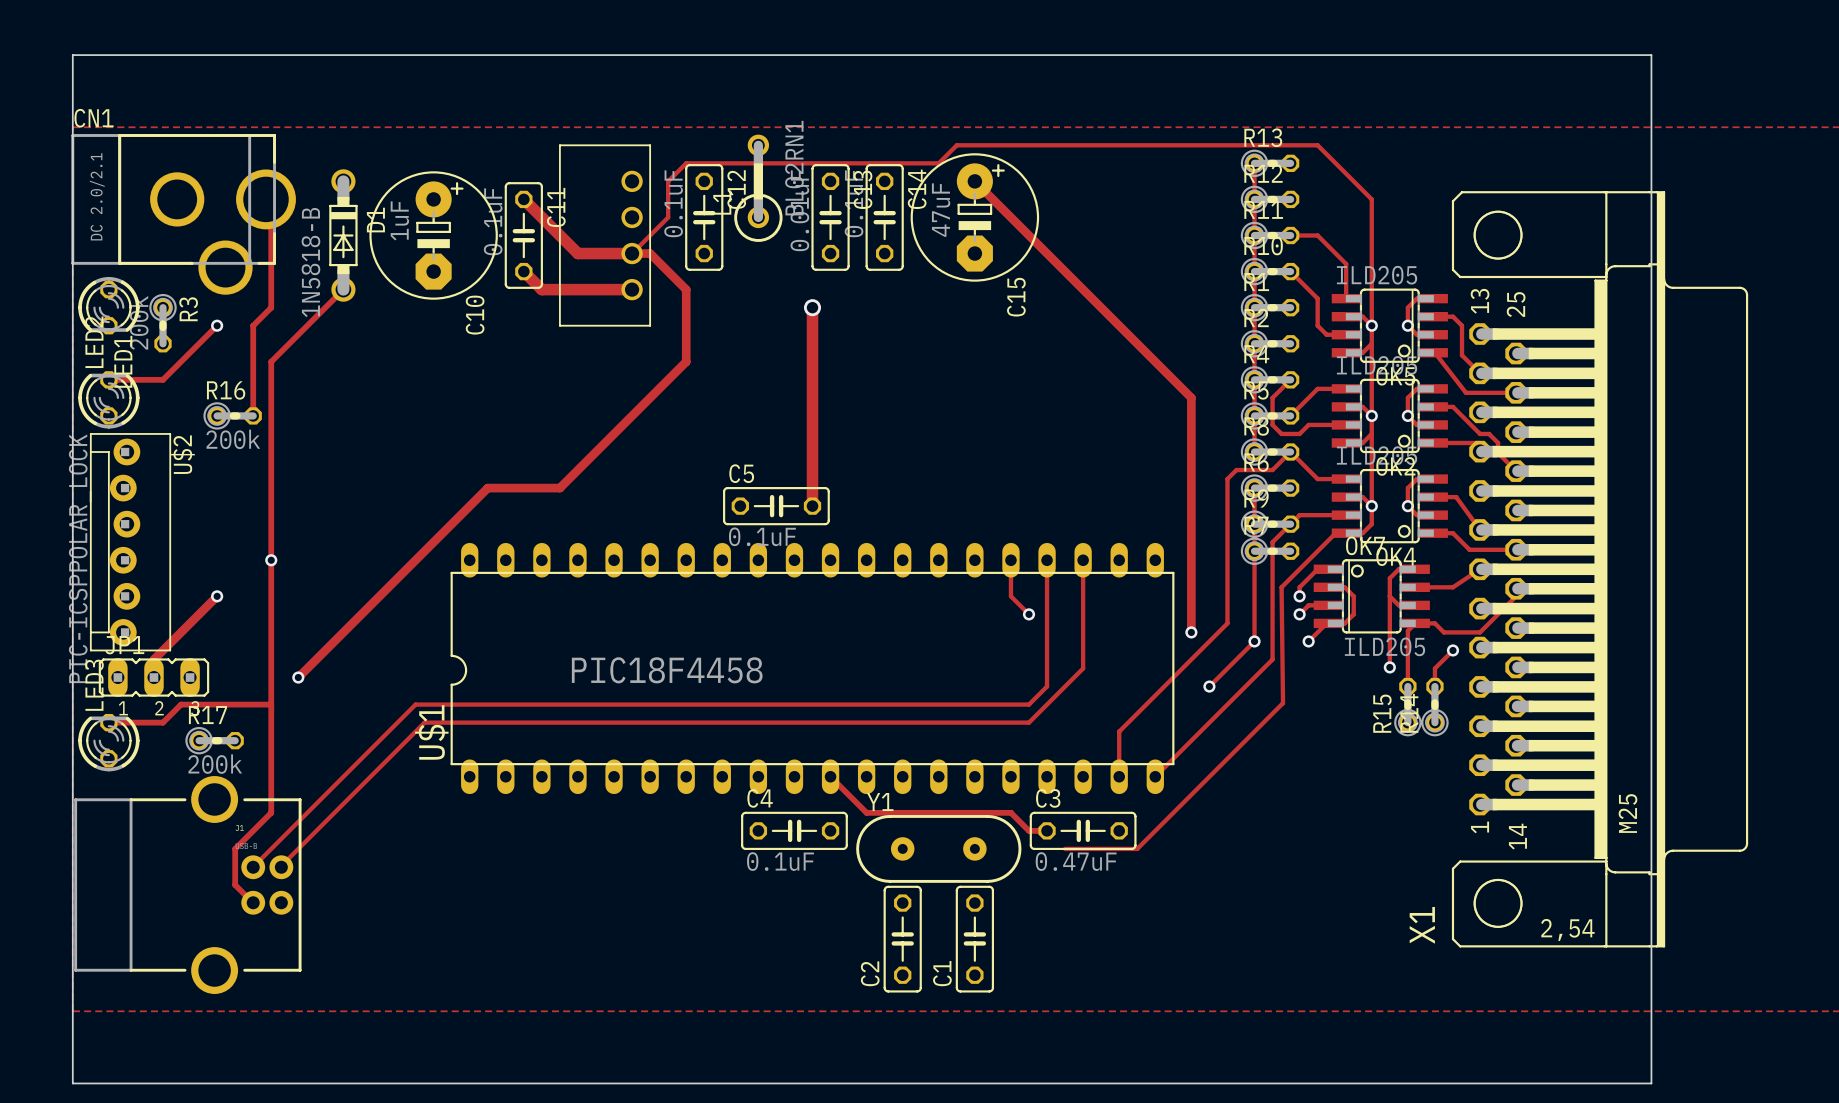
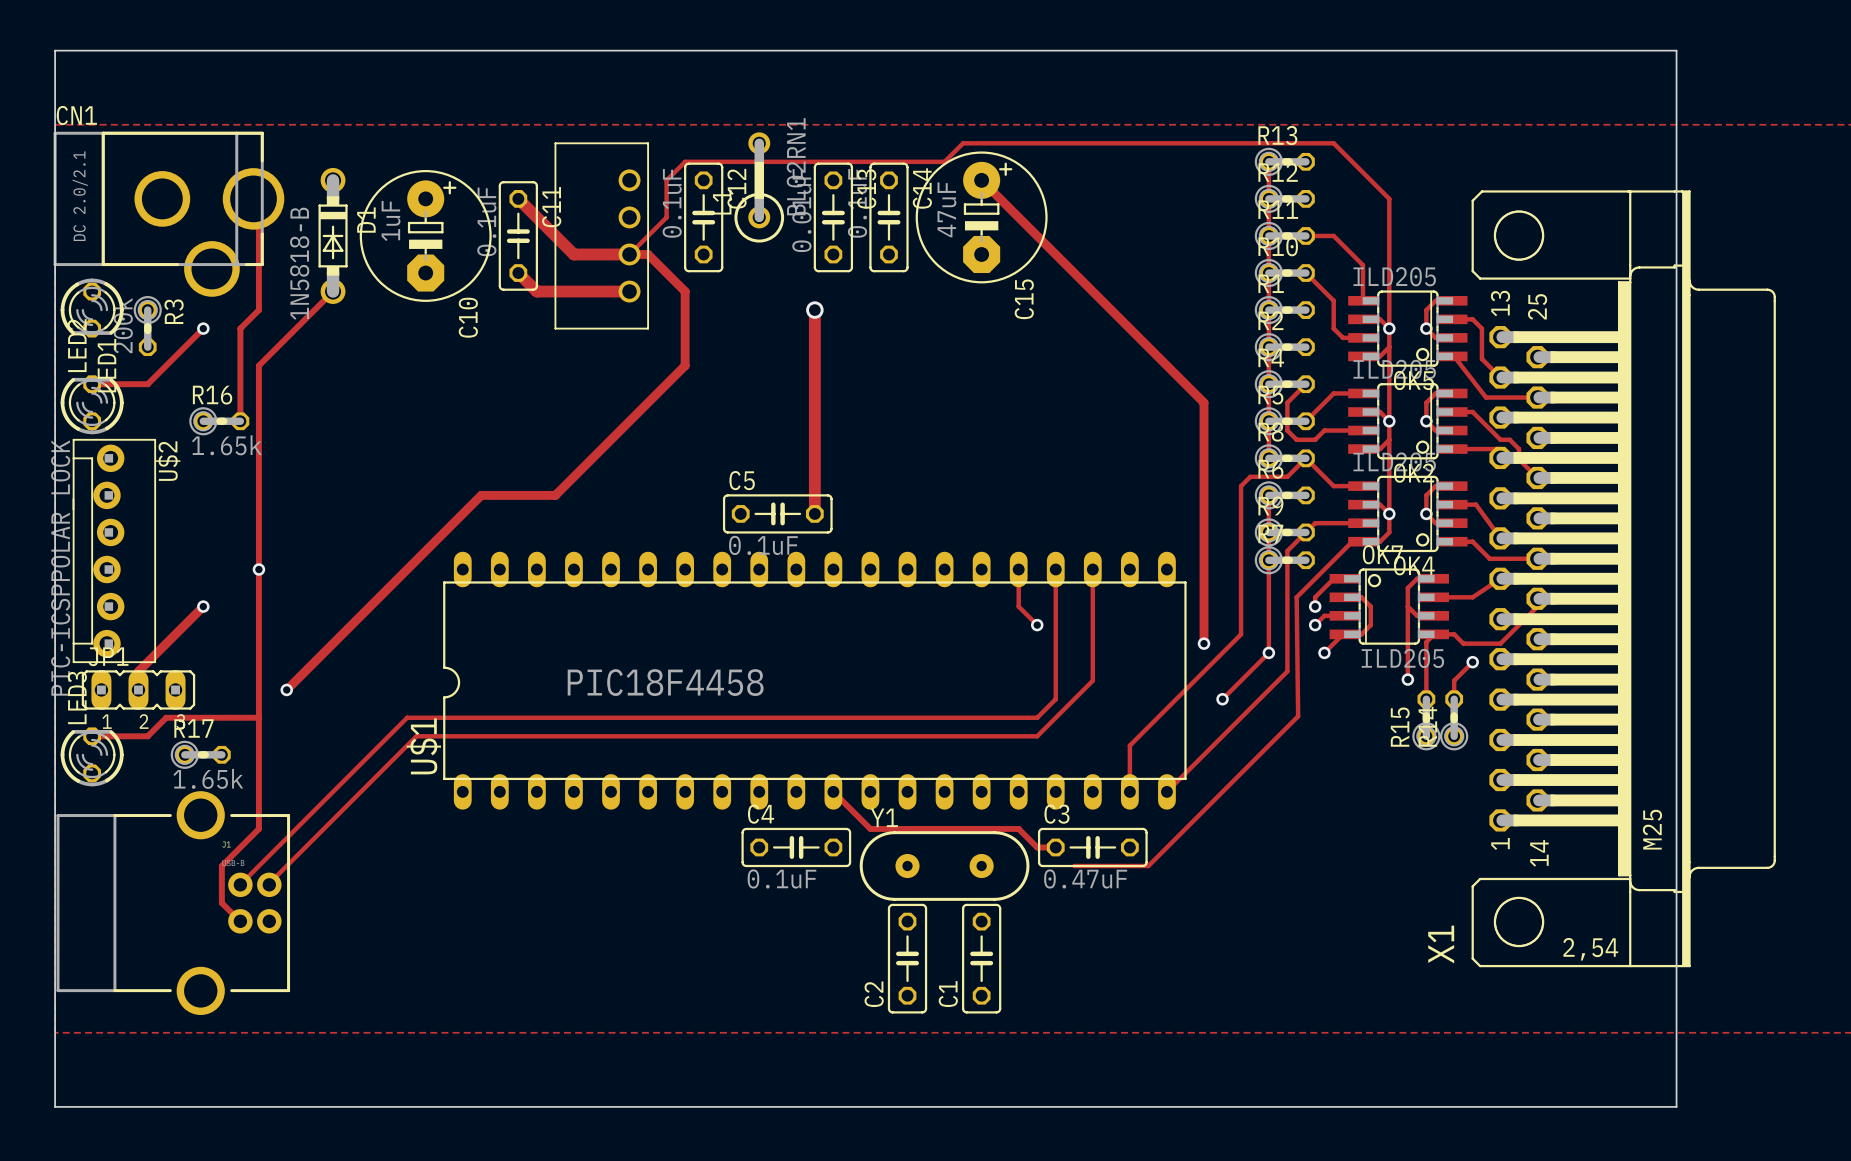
R16 value: 200k (233, 439) -> 1.65k (226, 445)
R17 value: 200k (215, 764) -> 1.65k (208, 778)

